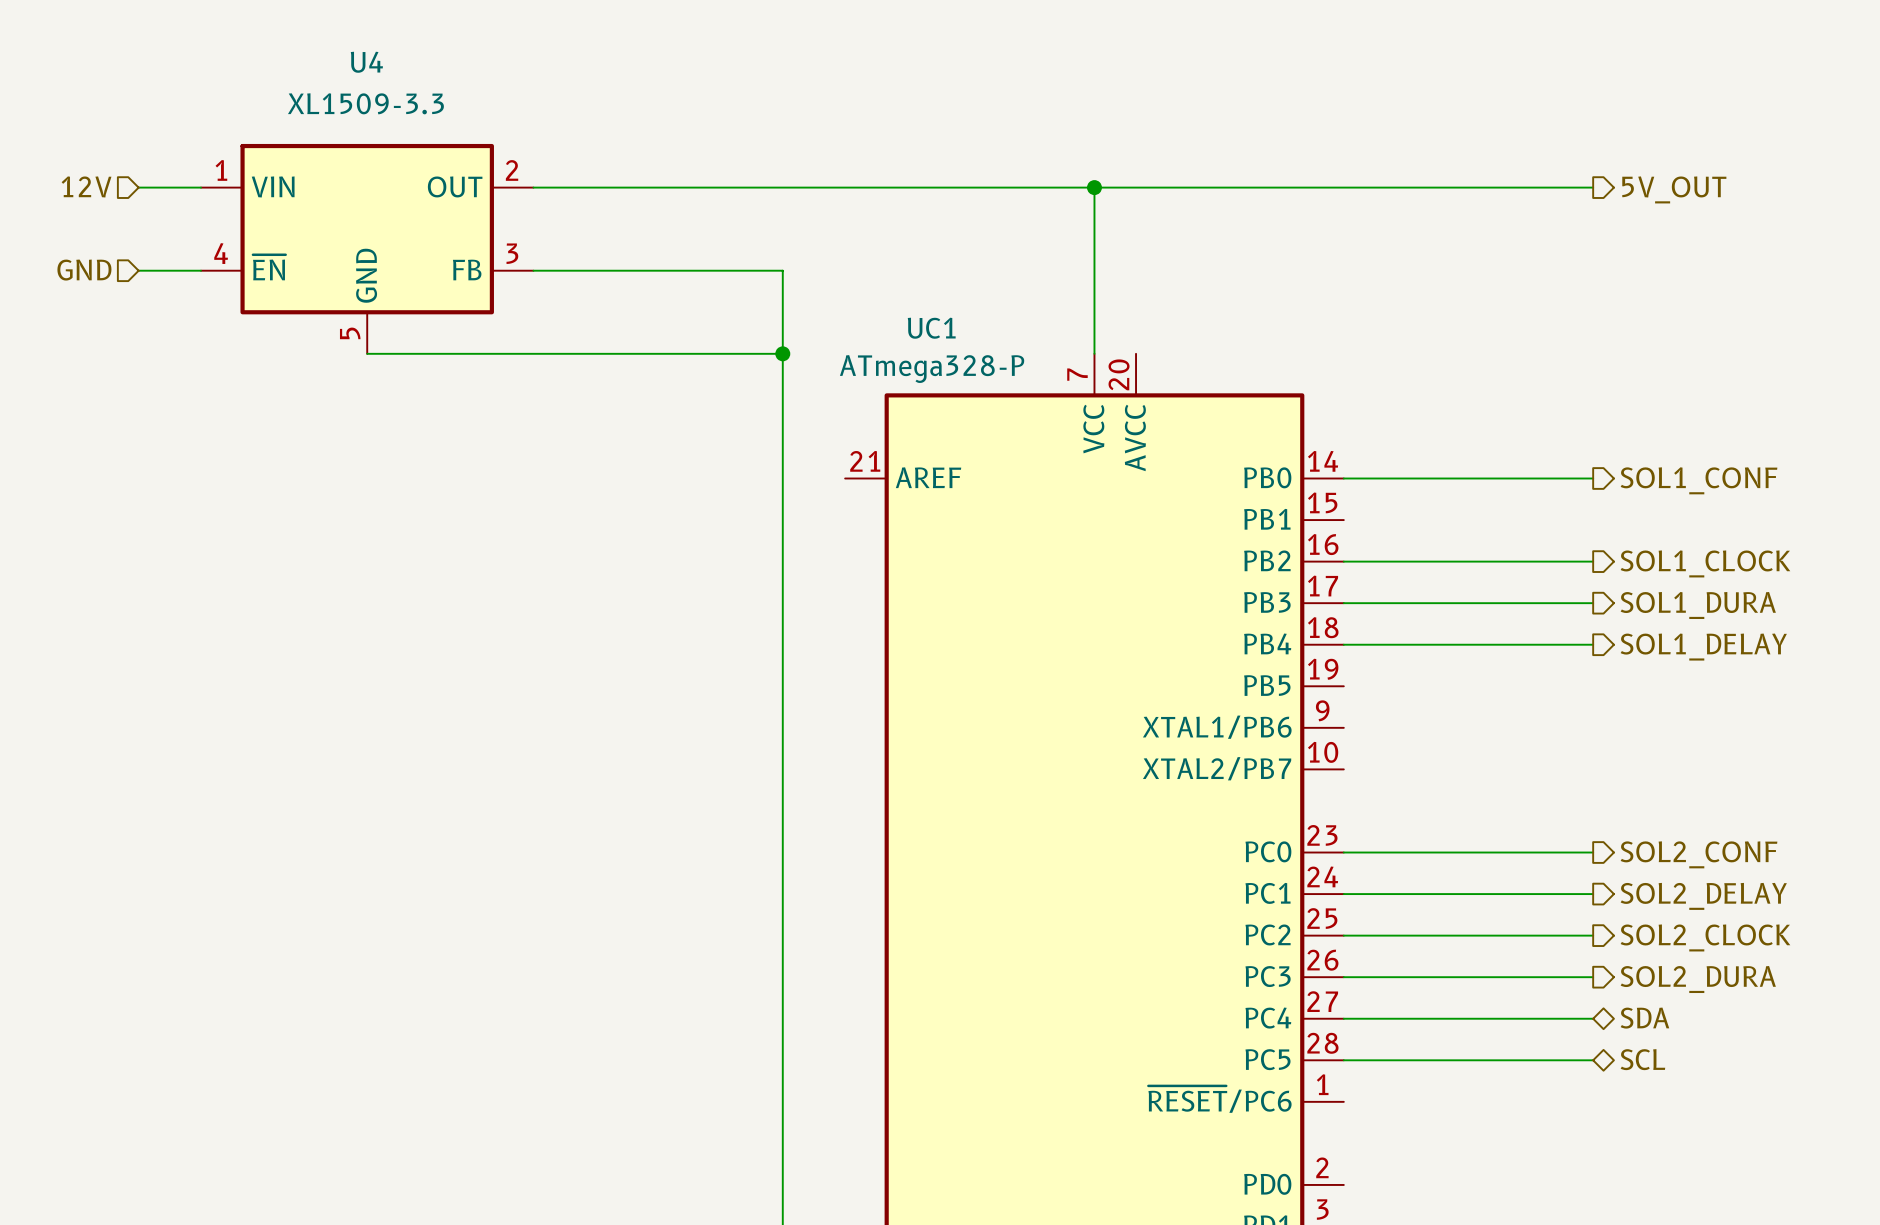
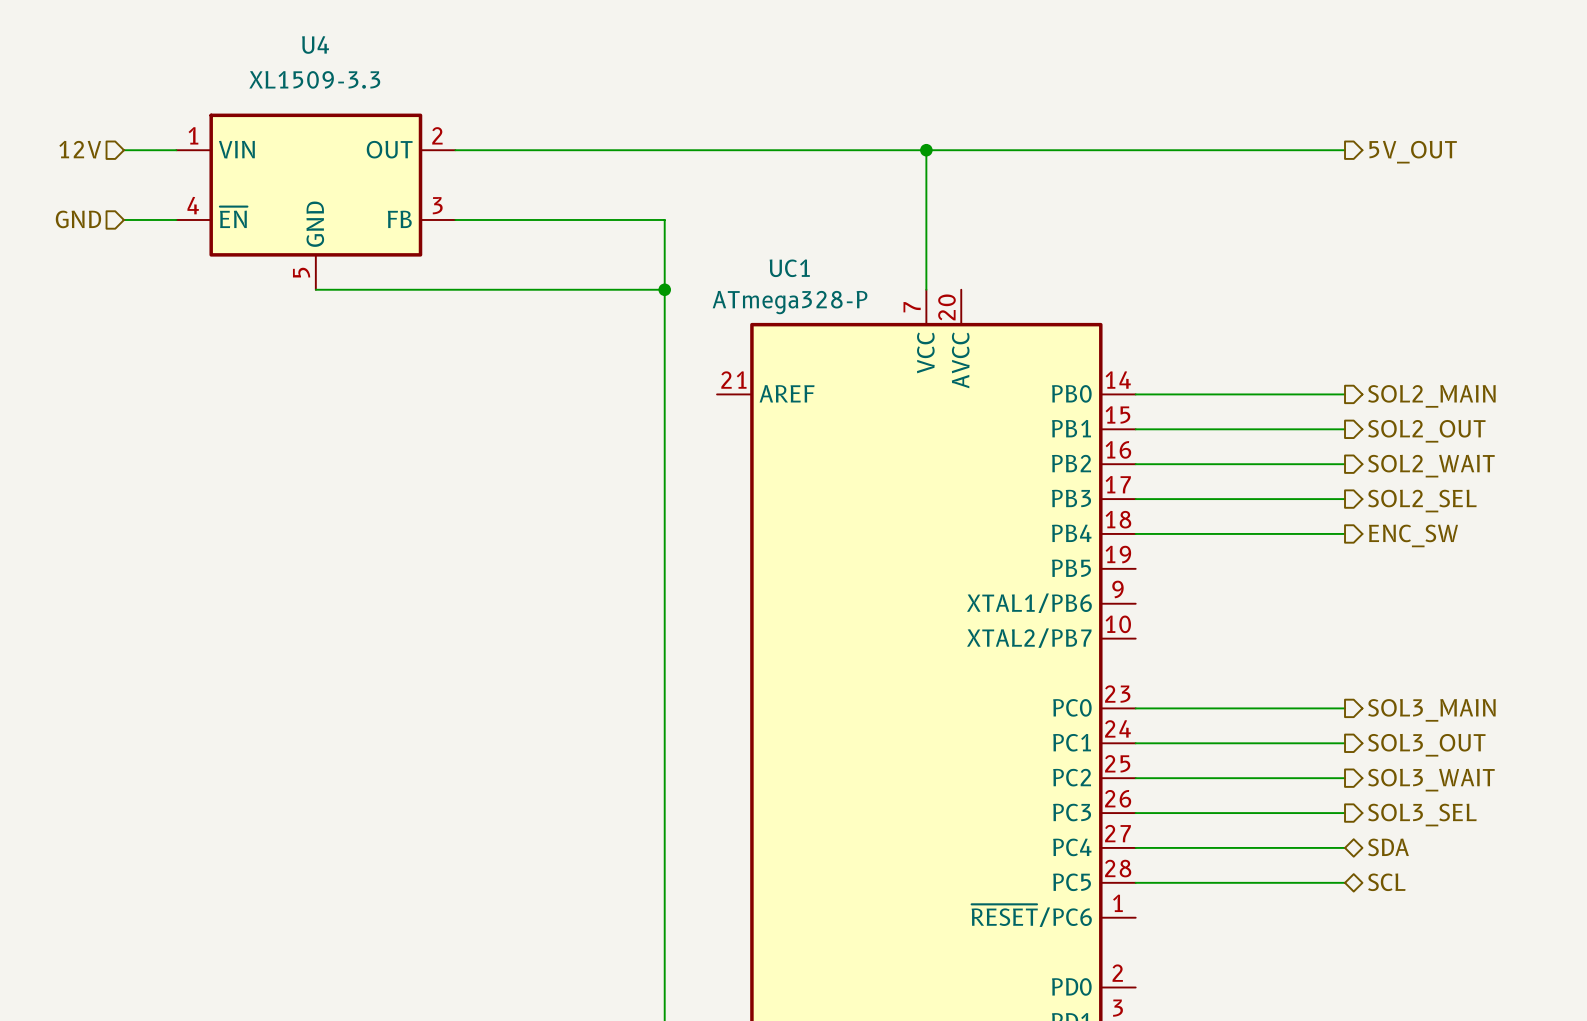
hierarchical label: SOL1_CONF (1699, 480) -> SOL2_MAIN (1431, 396)
wire: none -> (1135, 429) (1345, 429)
hierarchical label: none -> SOL2_OUT (1426, 431)
hierarchical label: SOL1_CLOCK (1705, 563) -> SOL2_WAIT (1431, 466)
hierarchical label: SOL1_DURA (1698, 605) -> SOL2_SEL (1422, 501)
hierarchical label: SOL1_DELAY (1703, 647) -> ENC_SW (1413, 535)
hierarchical label: SOL2_CONF (1699, 854) -> SOL3_MAIN (1431, 710)
hierarchical label: SOL2_DELAY (1703, 896) -> SOL3_OUT (1426, 745)
hierarchical label: SOL2_CLOCK (1705, 937) -> SOL3_WAIT (1431, 780)
hierarchical label: SOL2_DURA (1698, 979) -> SOL3_SEL (1422, 815)

